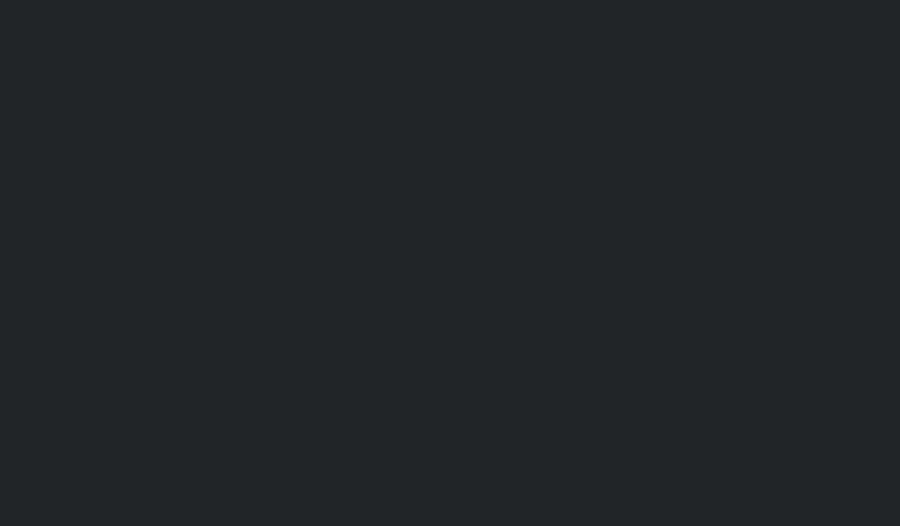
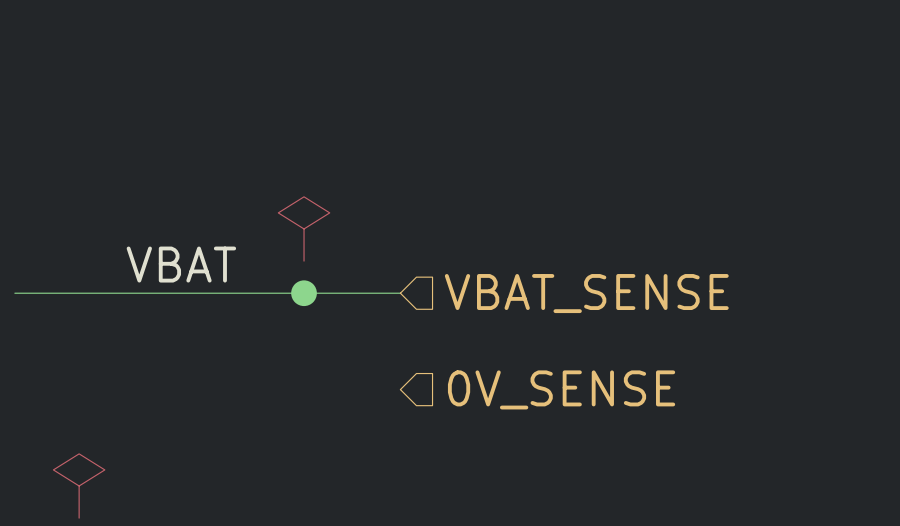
power symbol: none -> (304, 228)
label: none -> VBAT (181, 264)
wire: none -> (14, 293) (400, 293)
junction: none -> (304, 293)
hierarchical label: none -> VBAT_SENSE (586, 293)
hierarchical label: none -> 0V_SENSE (561, 389)
power symbol: none -> (79, 485)

